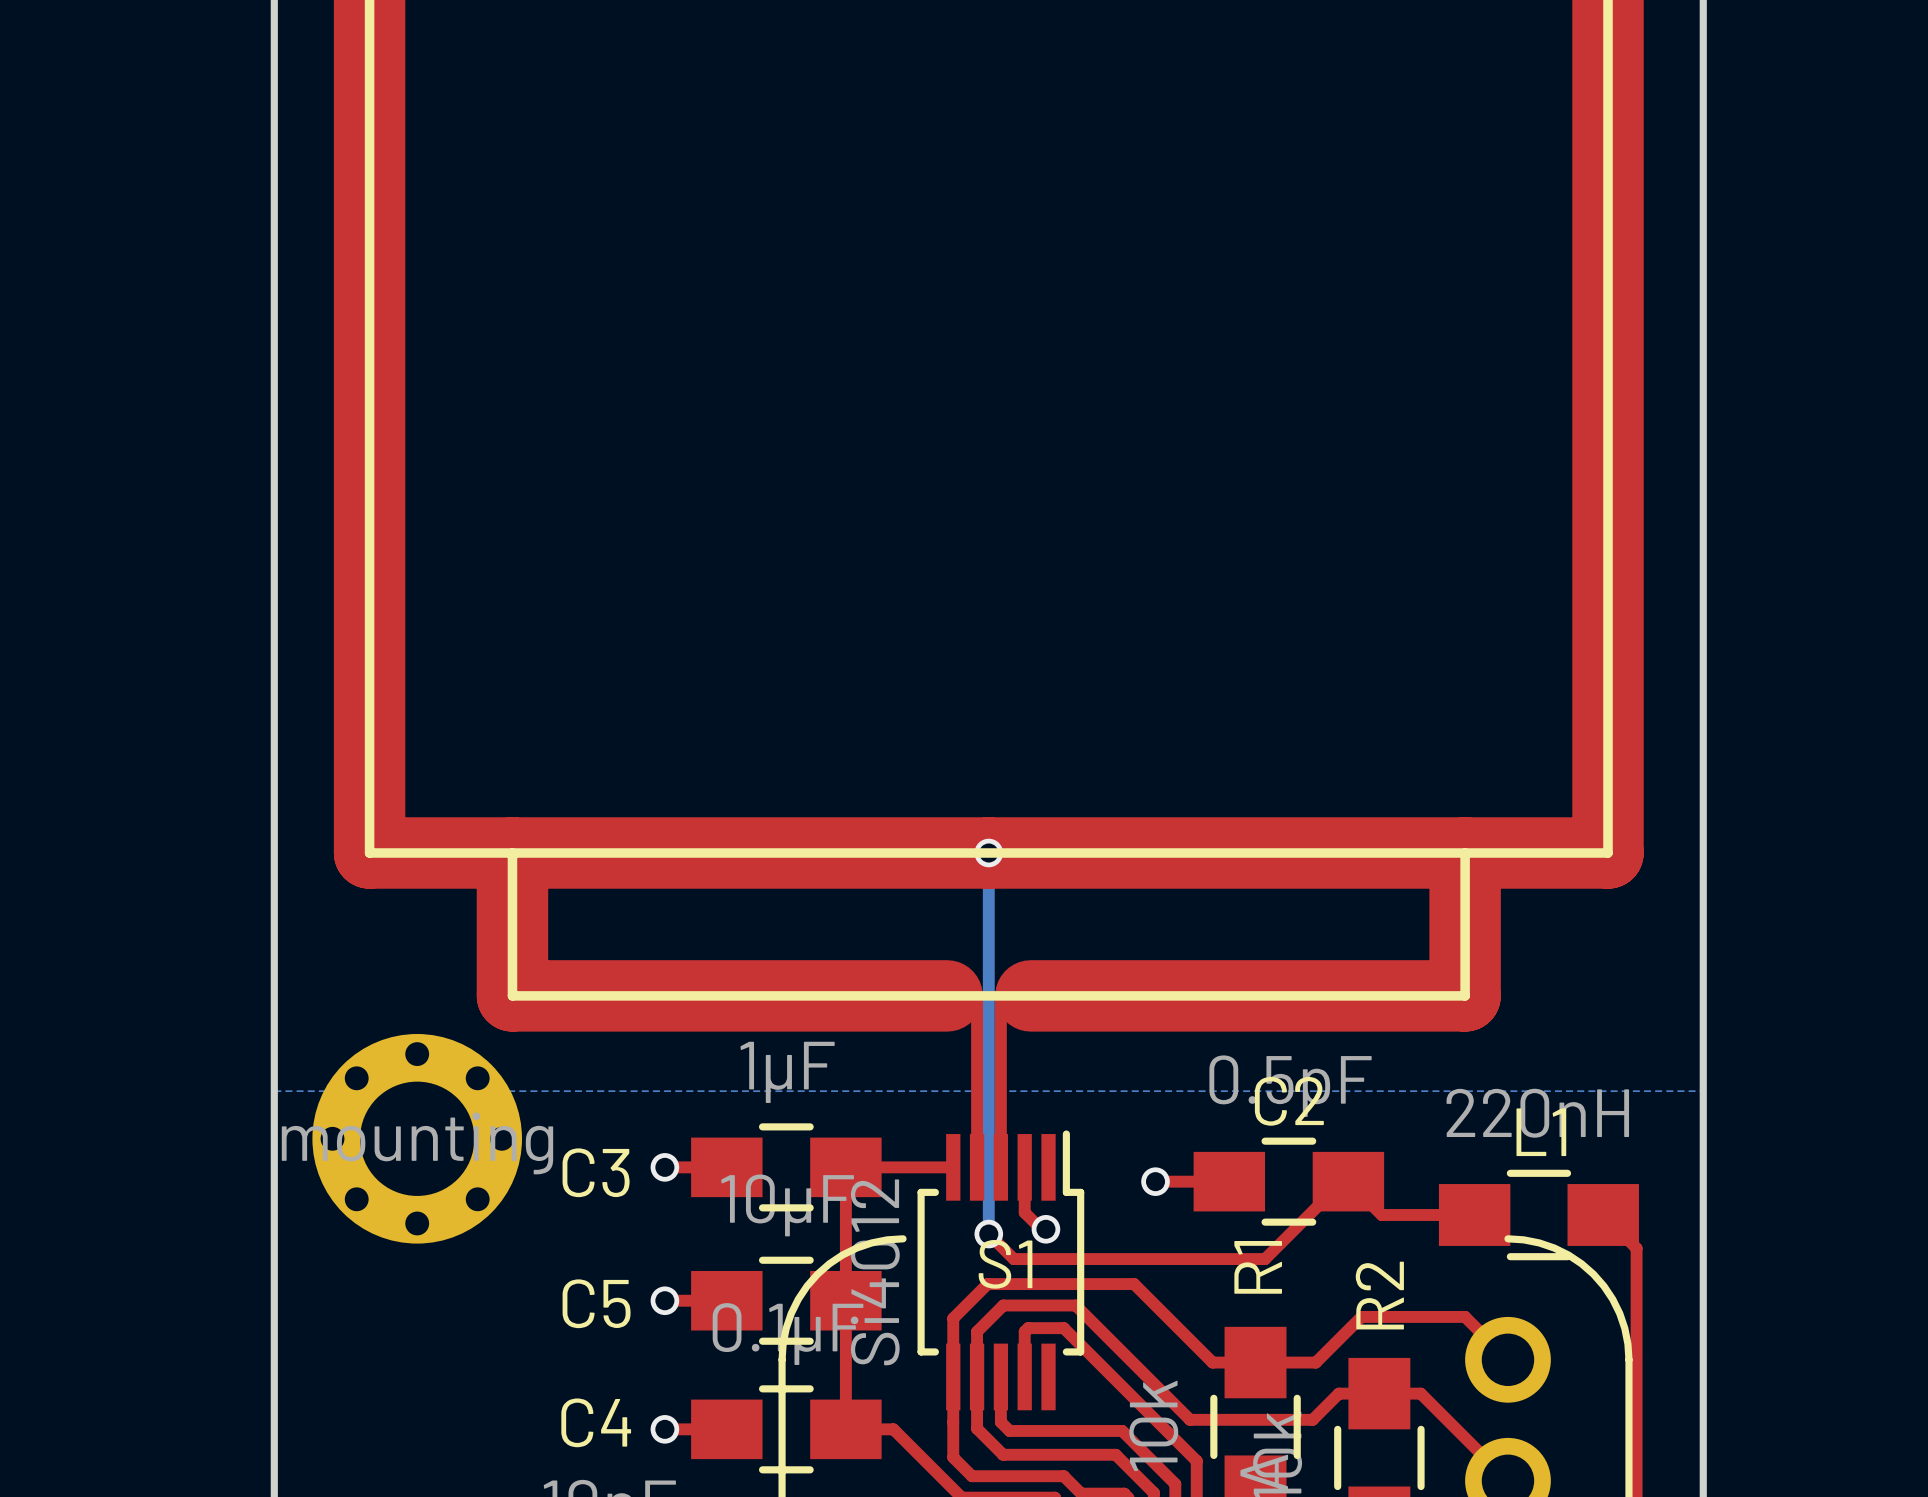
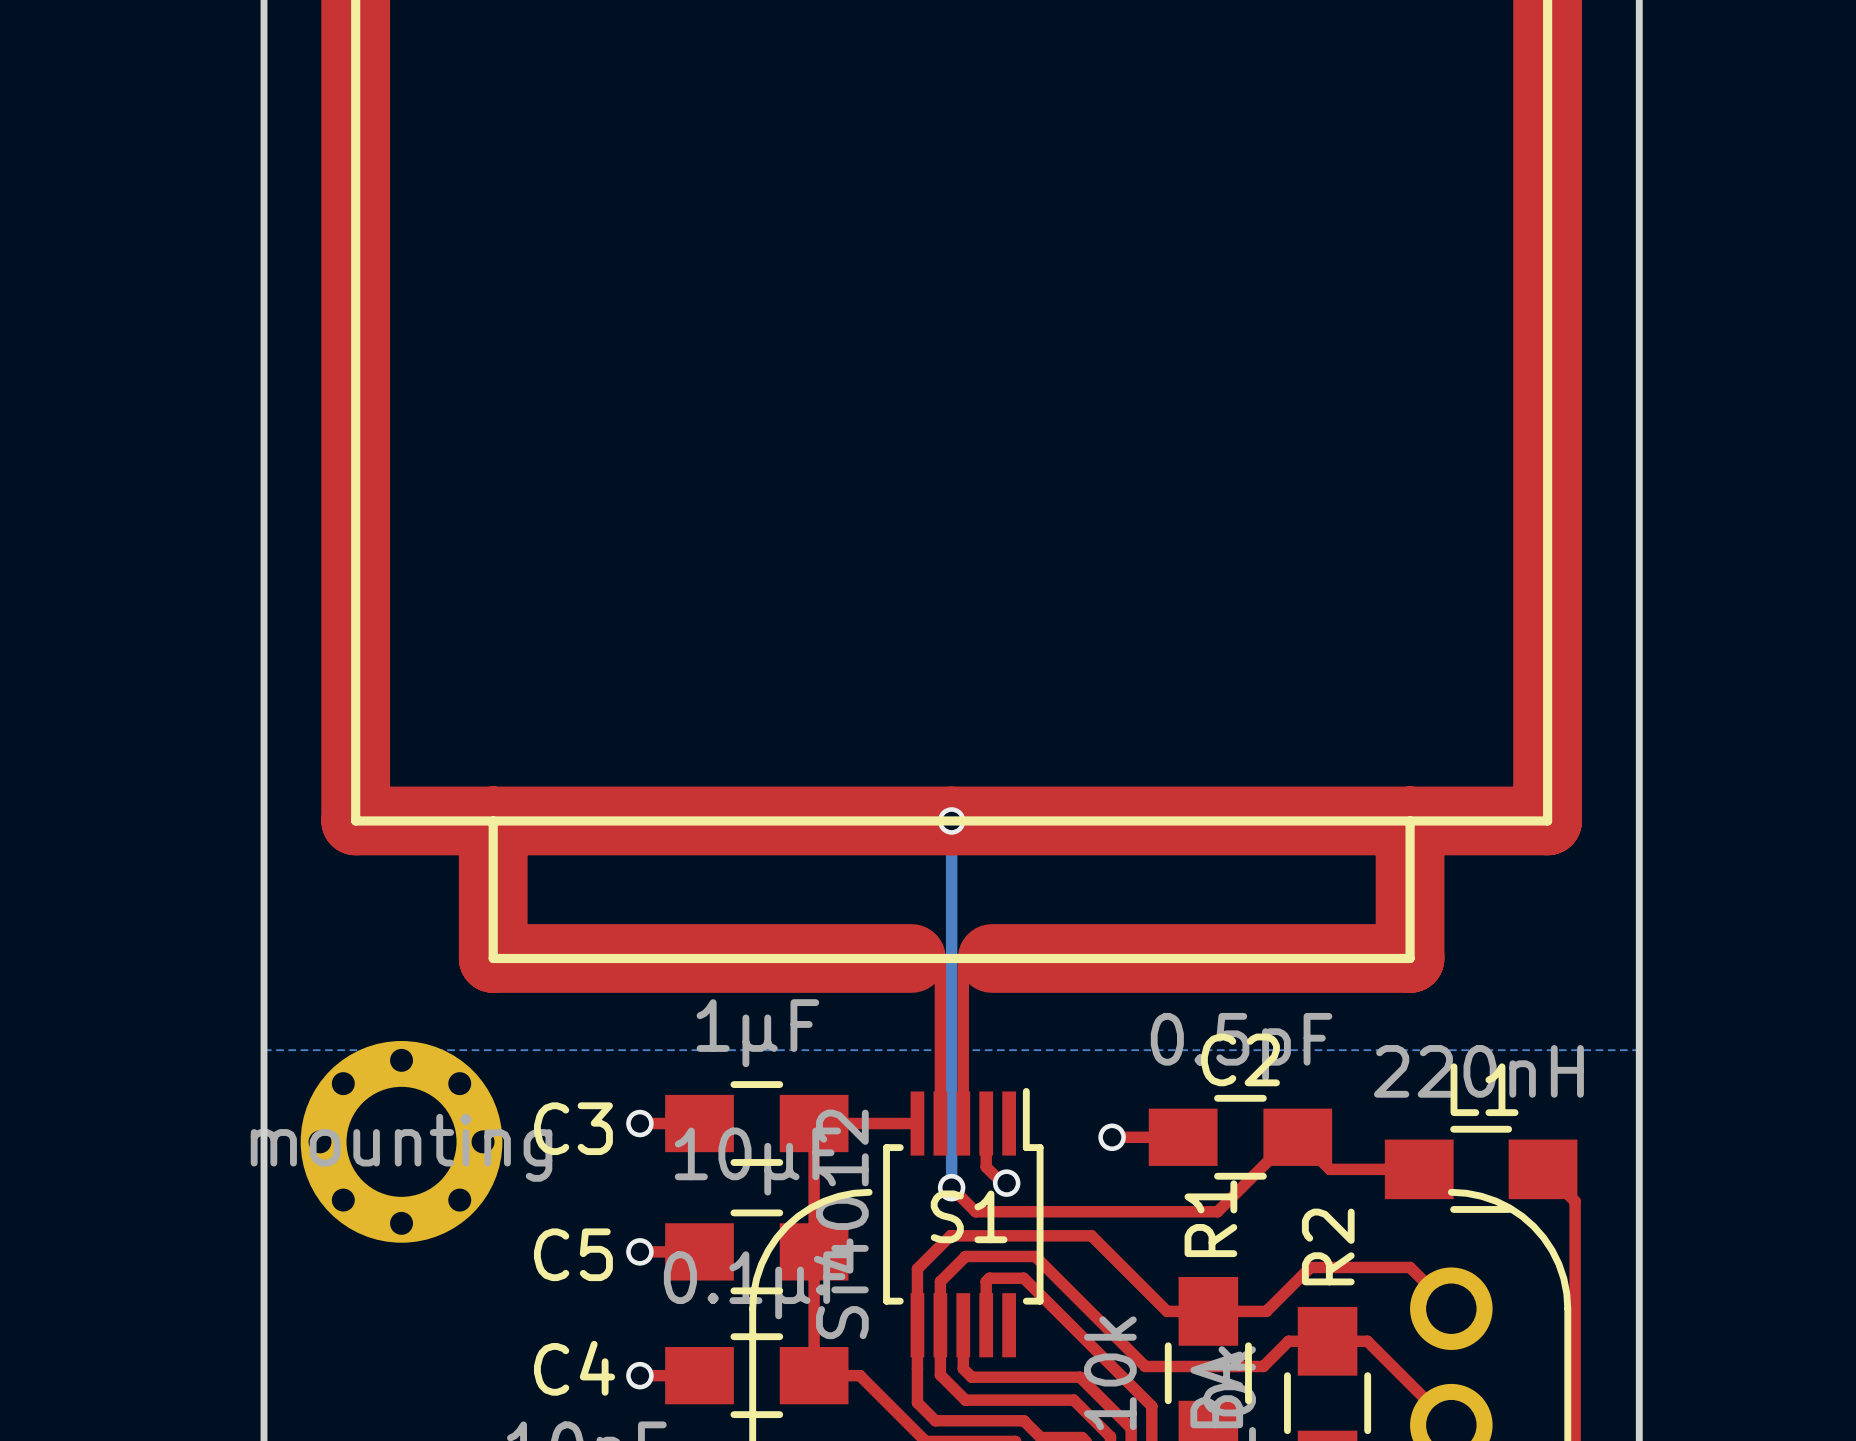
part position: (417, 1138) -> (401, 1141)

